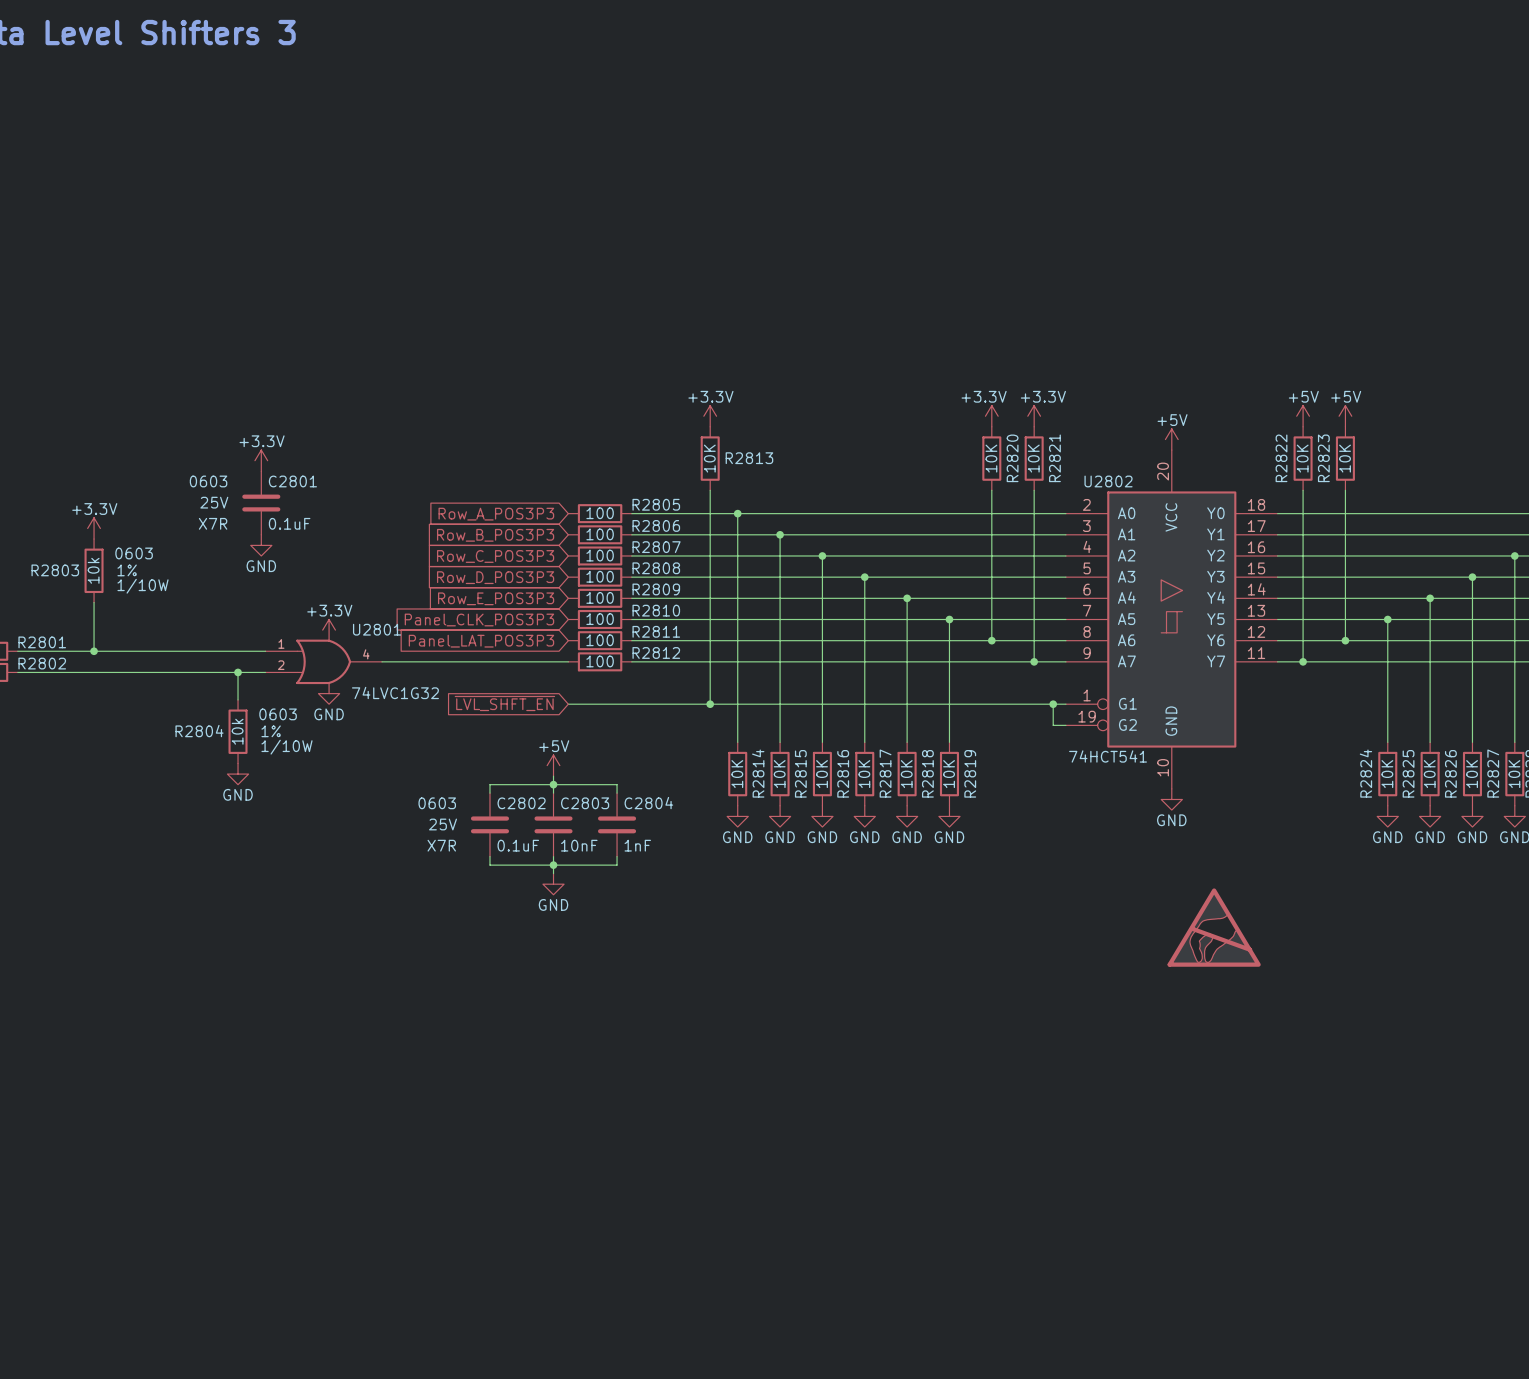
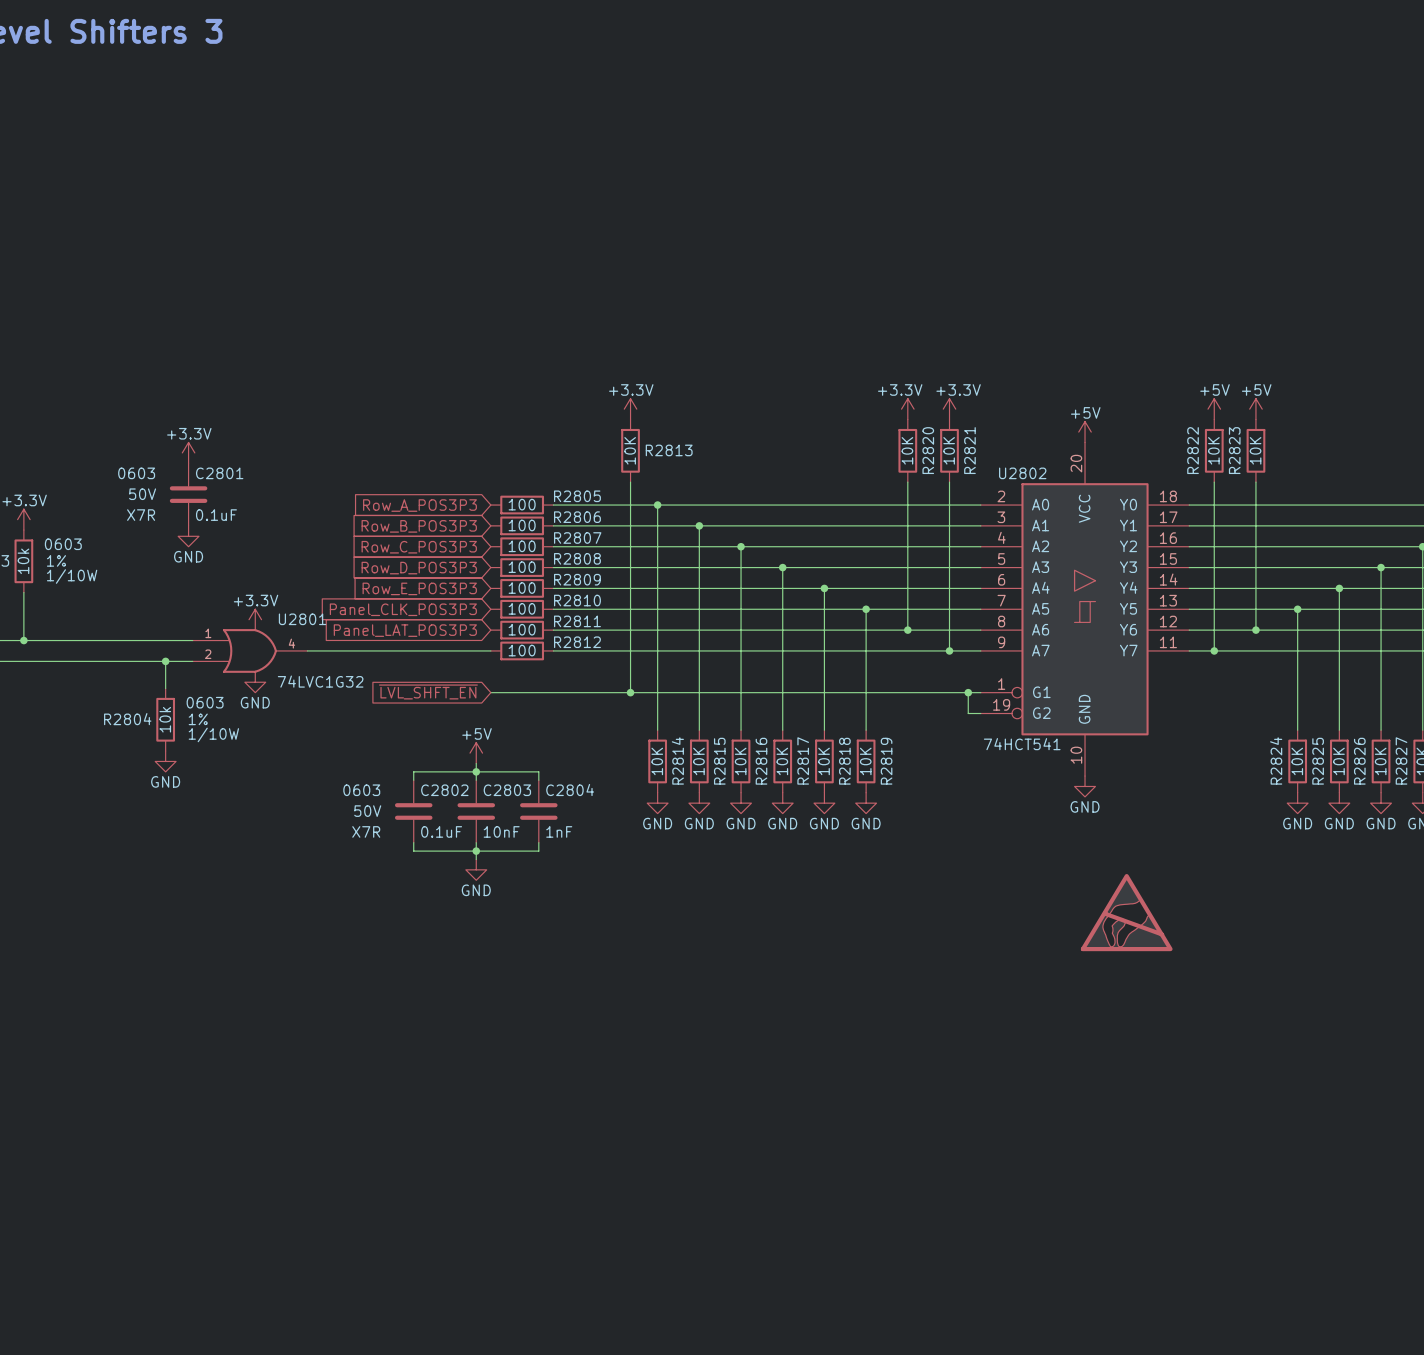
C2801 text: 25V (214, 502) -> 50V (142, 494)
C2802 text: 25V (443, 824) -> 50V (367, 811)

